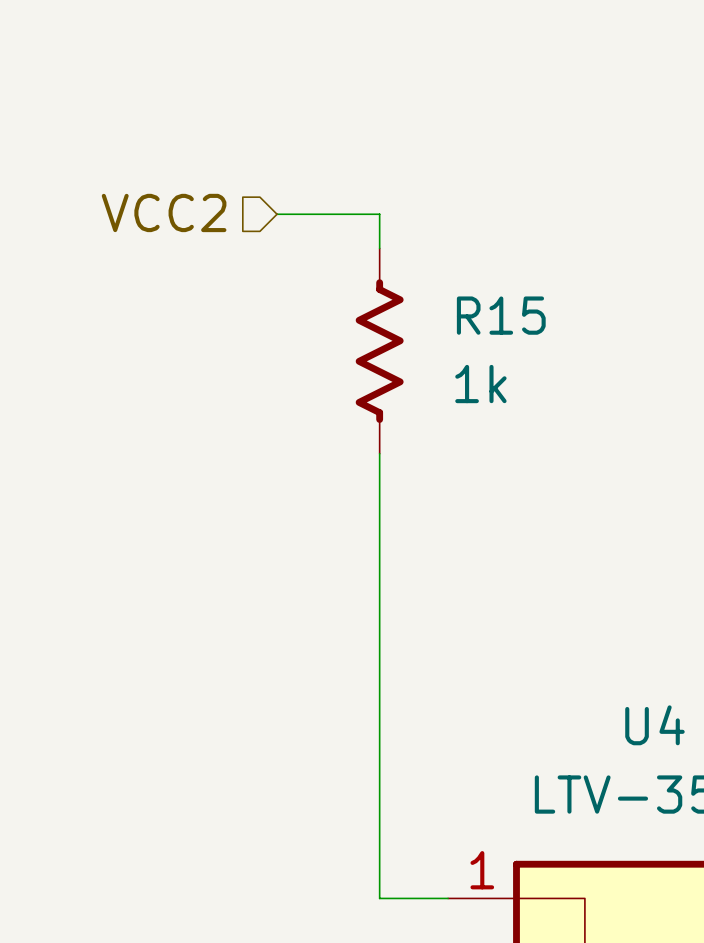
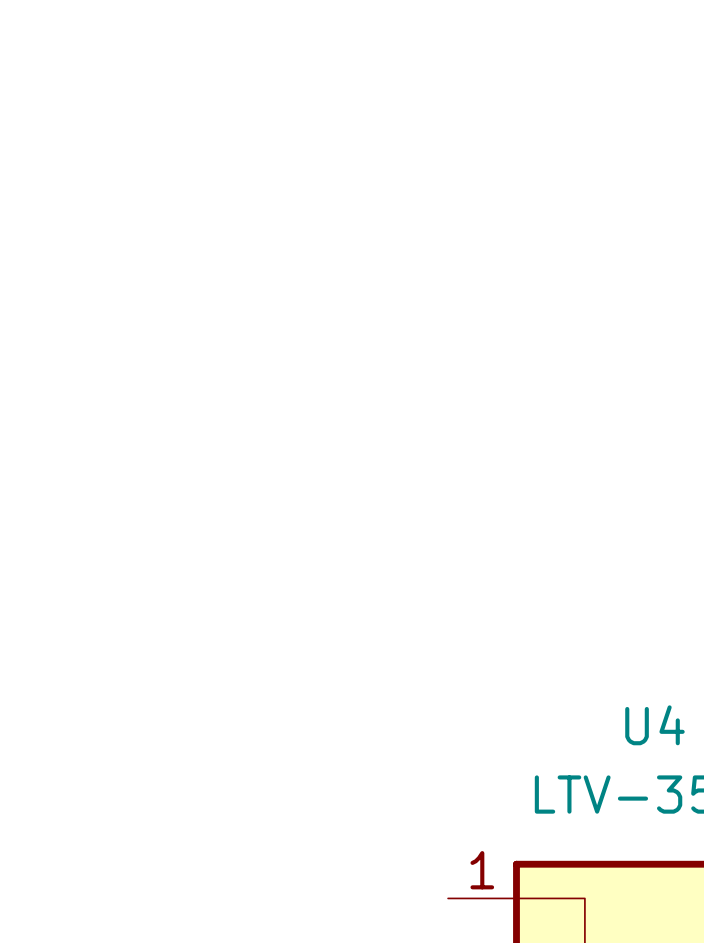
hierarchical label: VCC2 (164, 212) -> none
wire: (277, 214) (379, 214) (379, 248) -> none
R15: 1k (379, 351) -> none
wire: (379, 453) (379, 898) (448, 898) -> none

